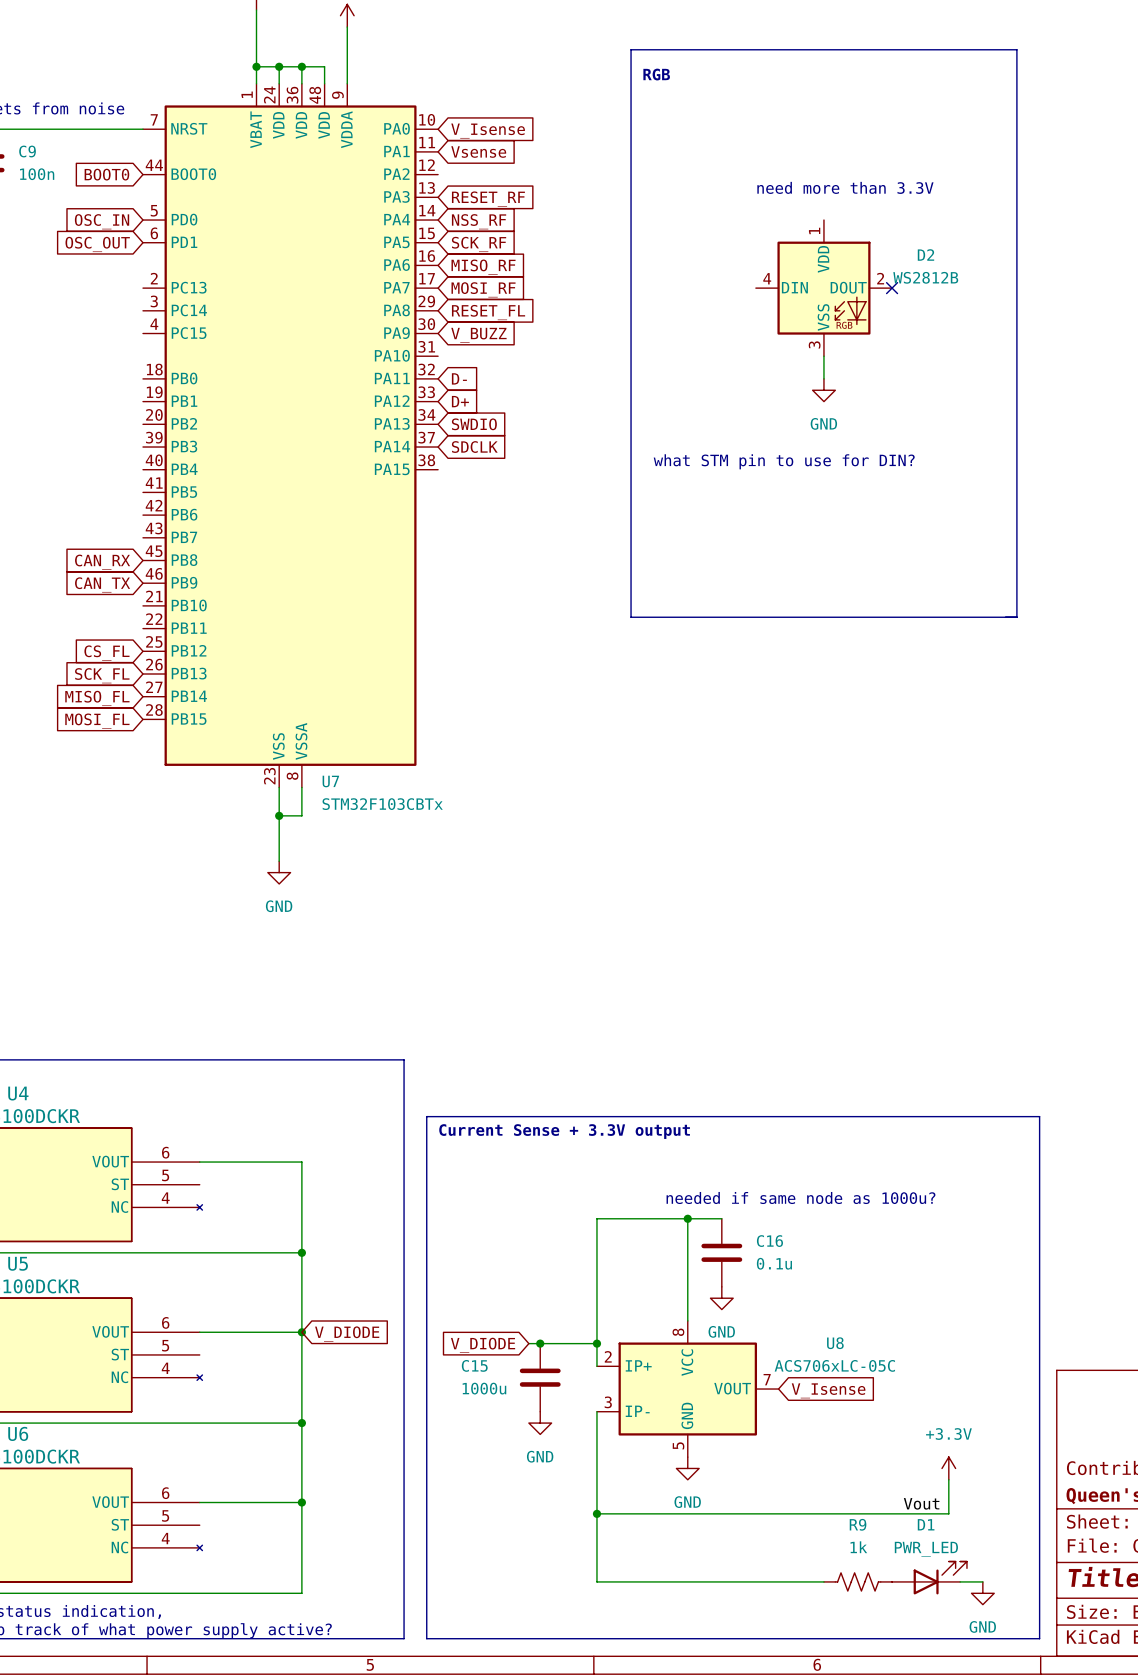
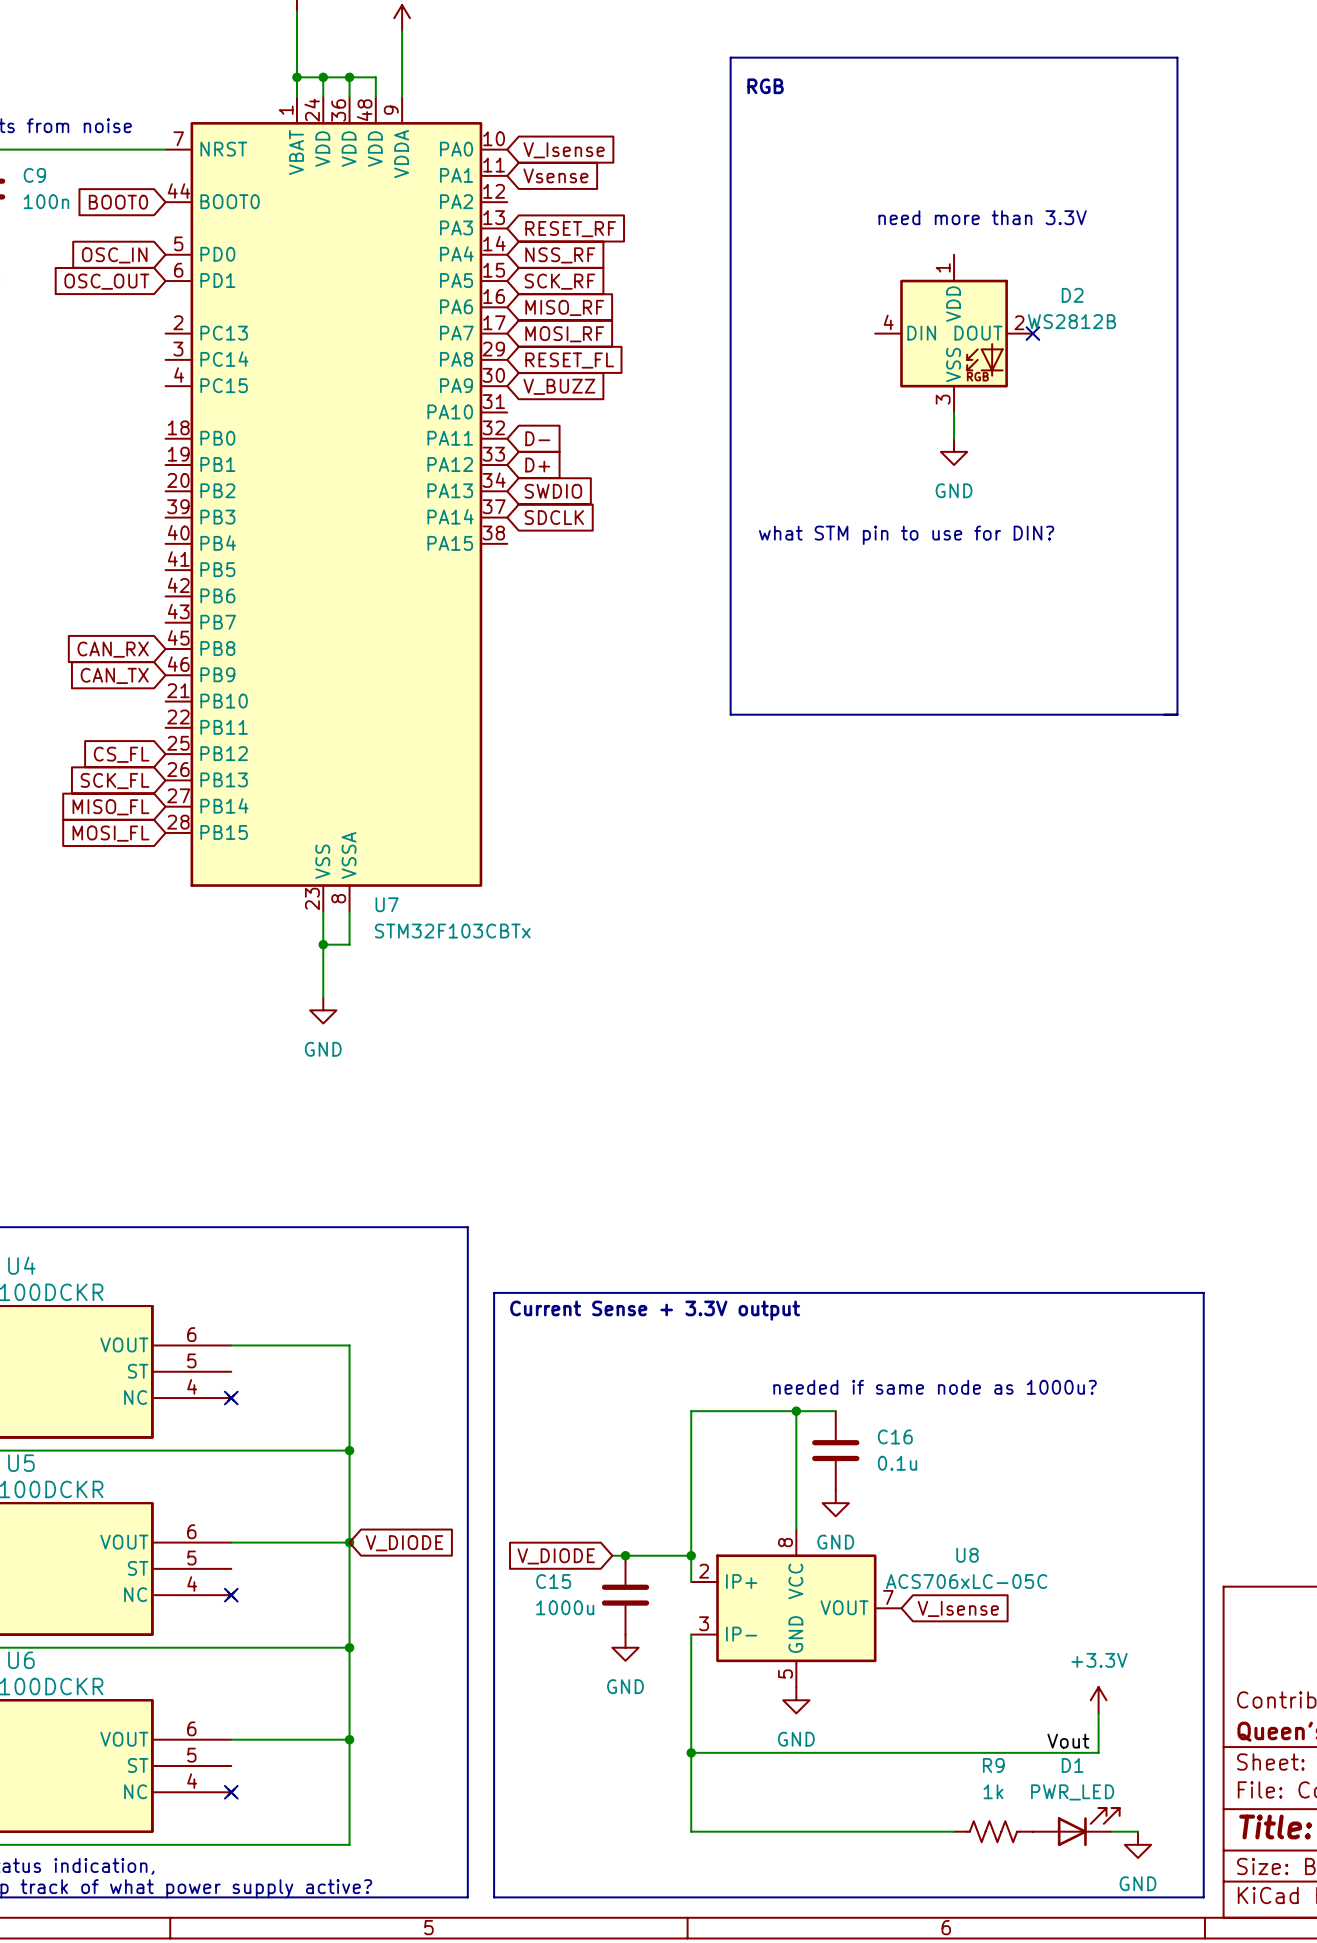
no-connect mark: none -> (231, 1398)
no-connect mark: none -> (231, 1595)
no-connect mark: none -> (231, 1792)

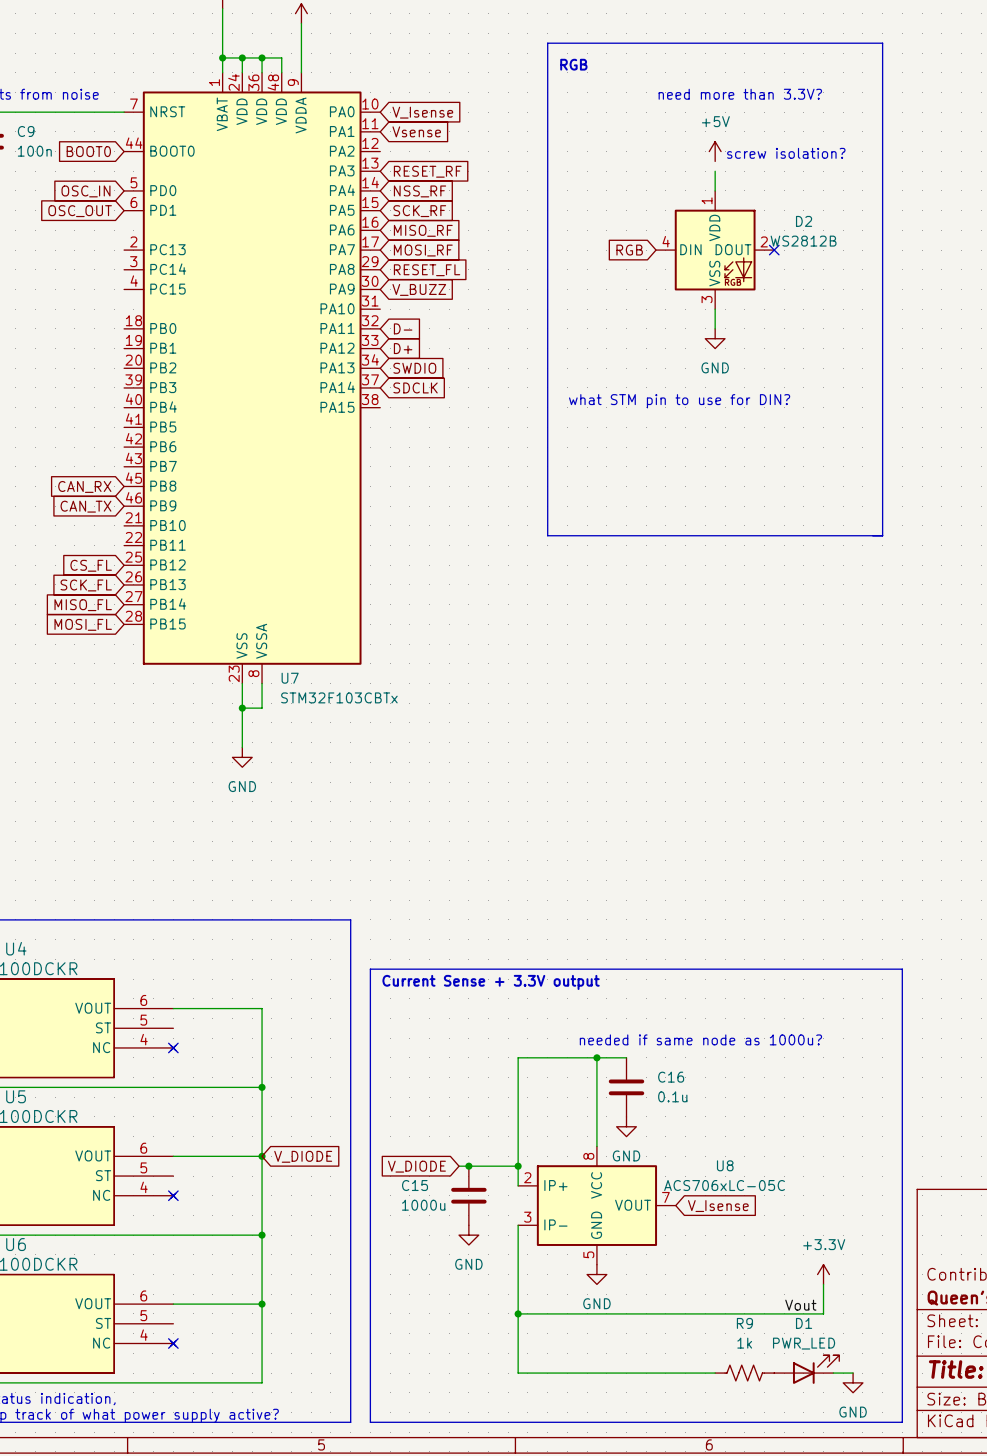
text: none -> need more than 3.3V? (740, 94)
power symbol: none -> +5V (715, 151)
text: none -> screw isolation? (786, 153)
text: need more than 3.3V (982, 217) -> none
wire: none -> (715, 171) (715, 190)
global label: none -> RGB (629, 250)

